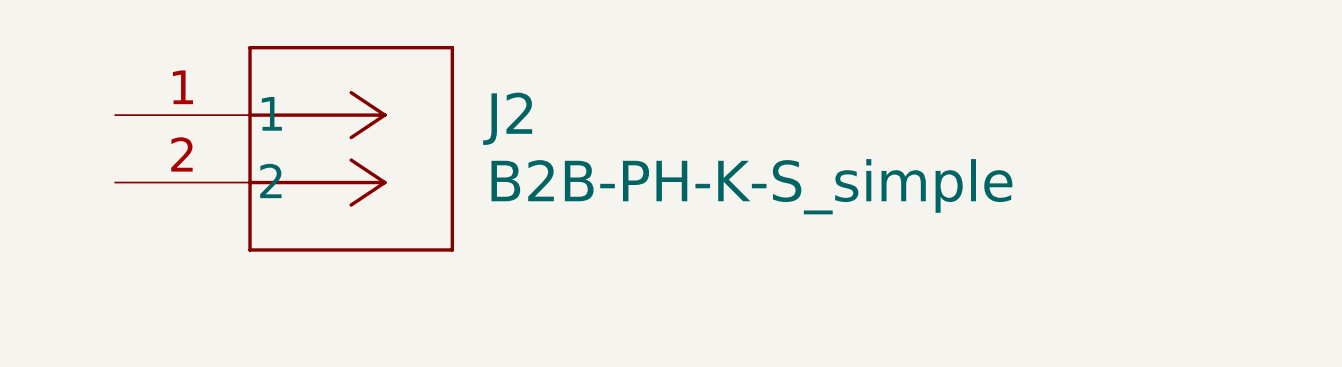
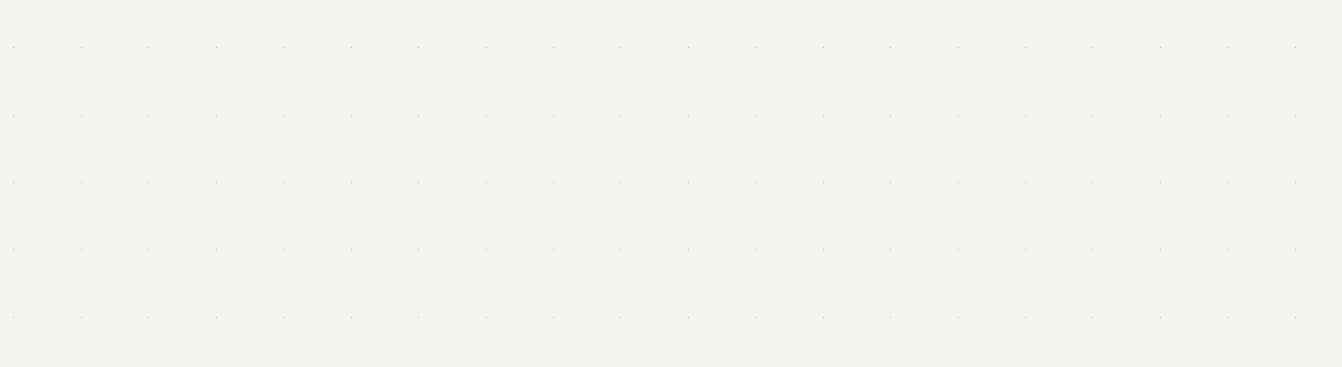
J2: B2B-PH-K-S_simple (284, 148) -> none

